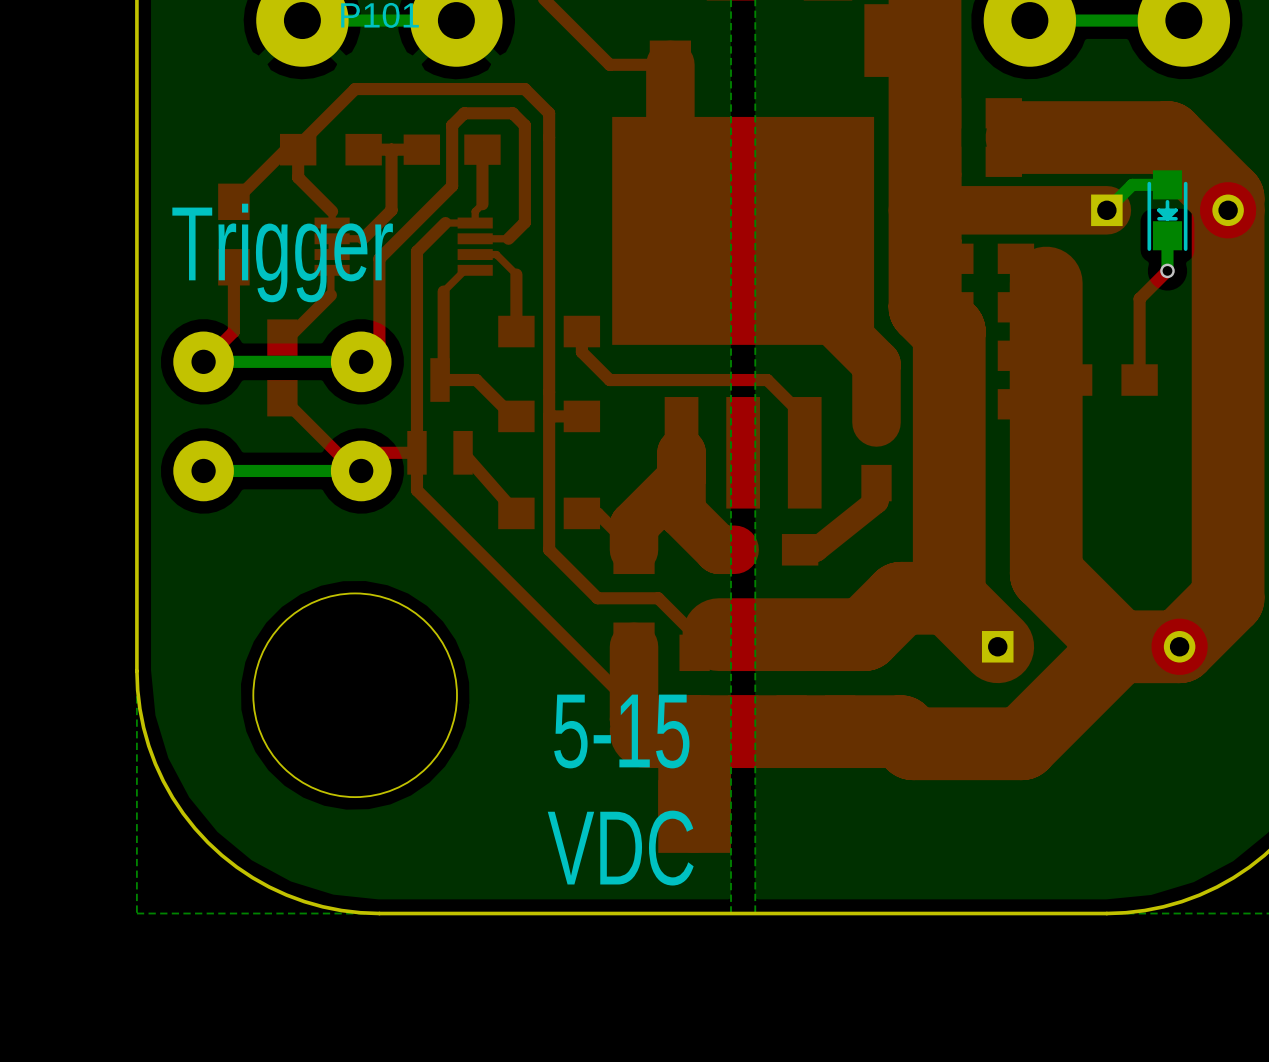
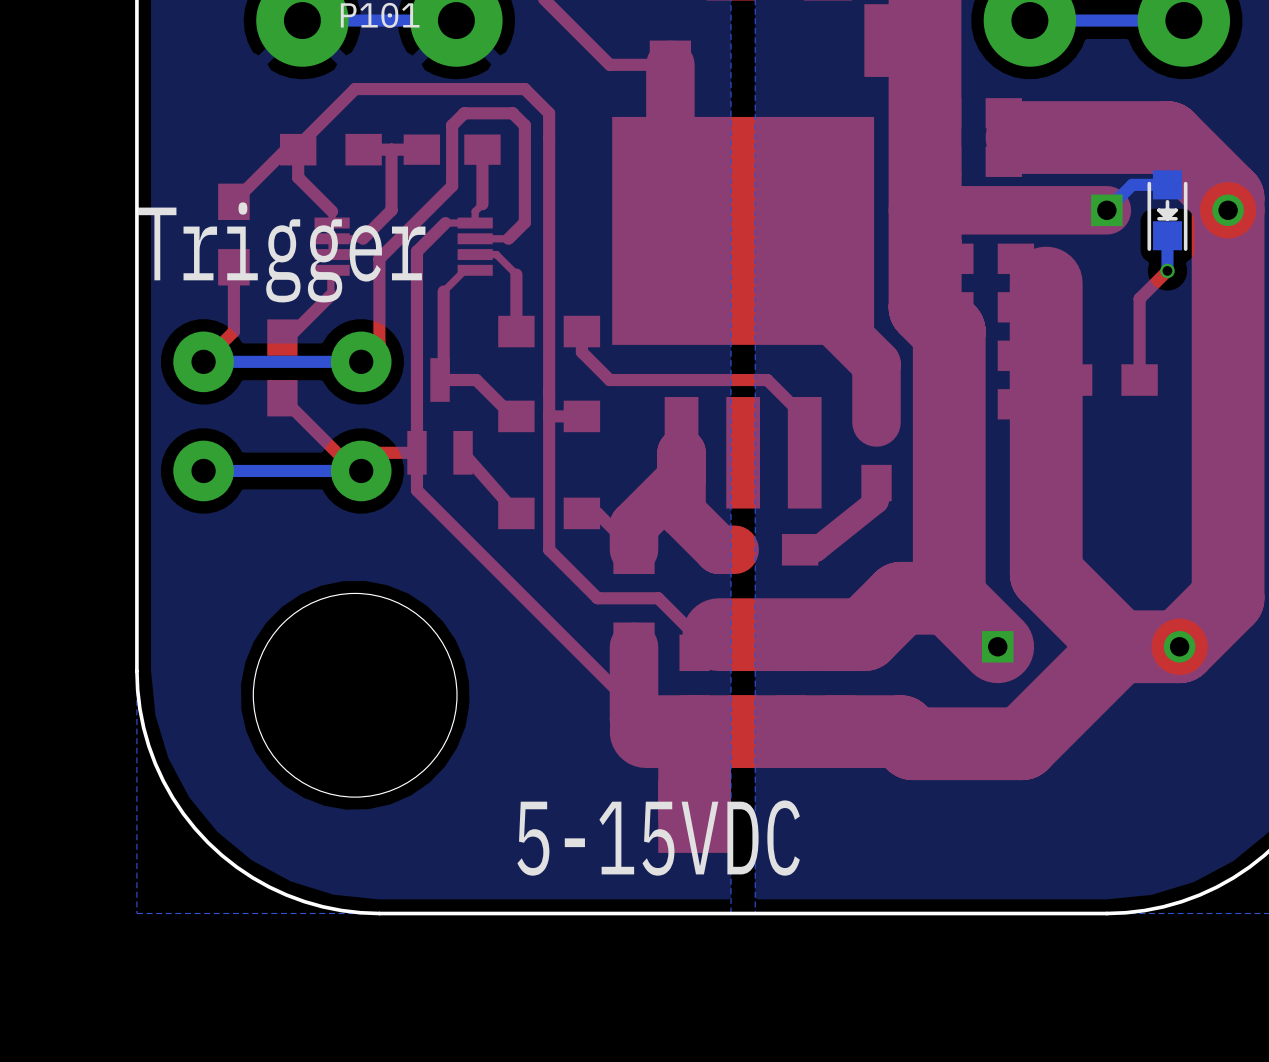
text: 5-15 (621, 731) -> 5-15VDC (658, 838)
text: VDC (620, 848) -> none

